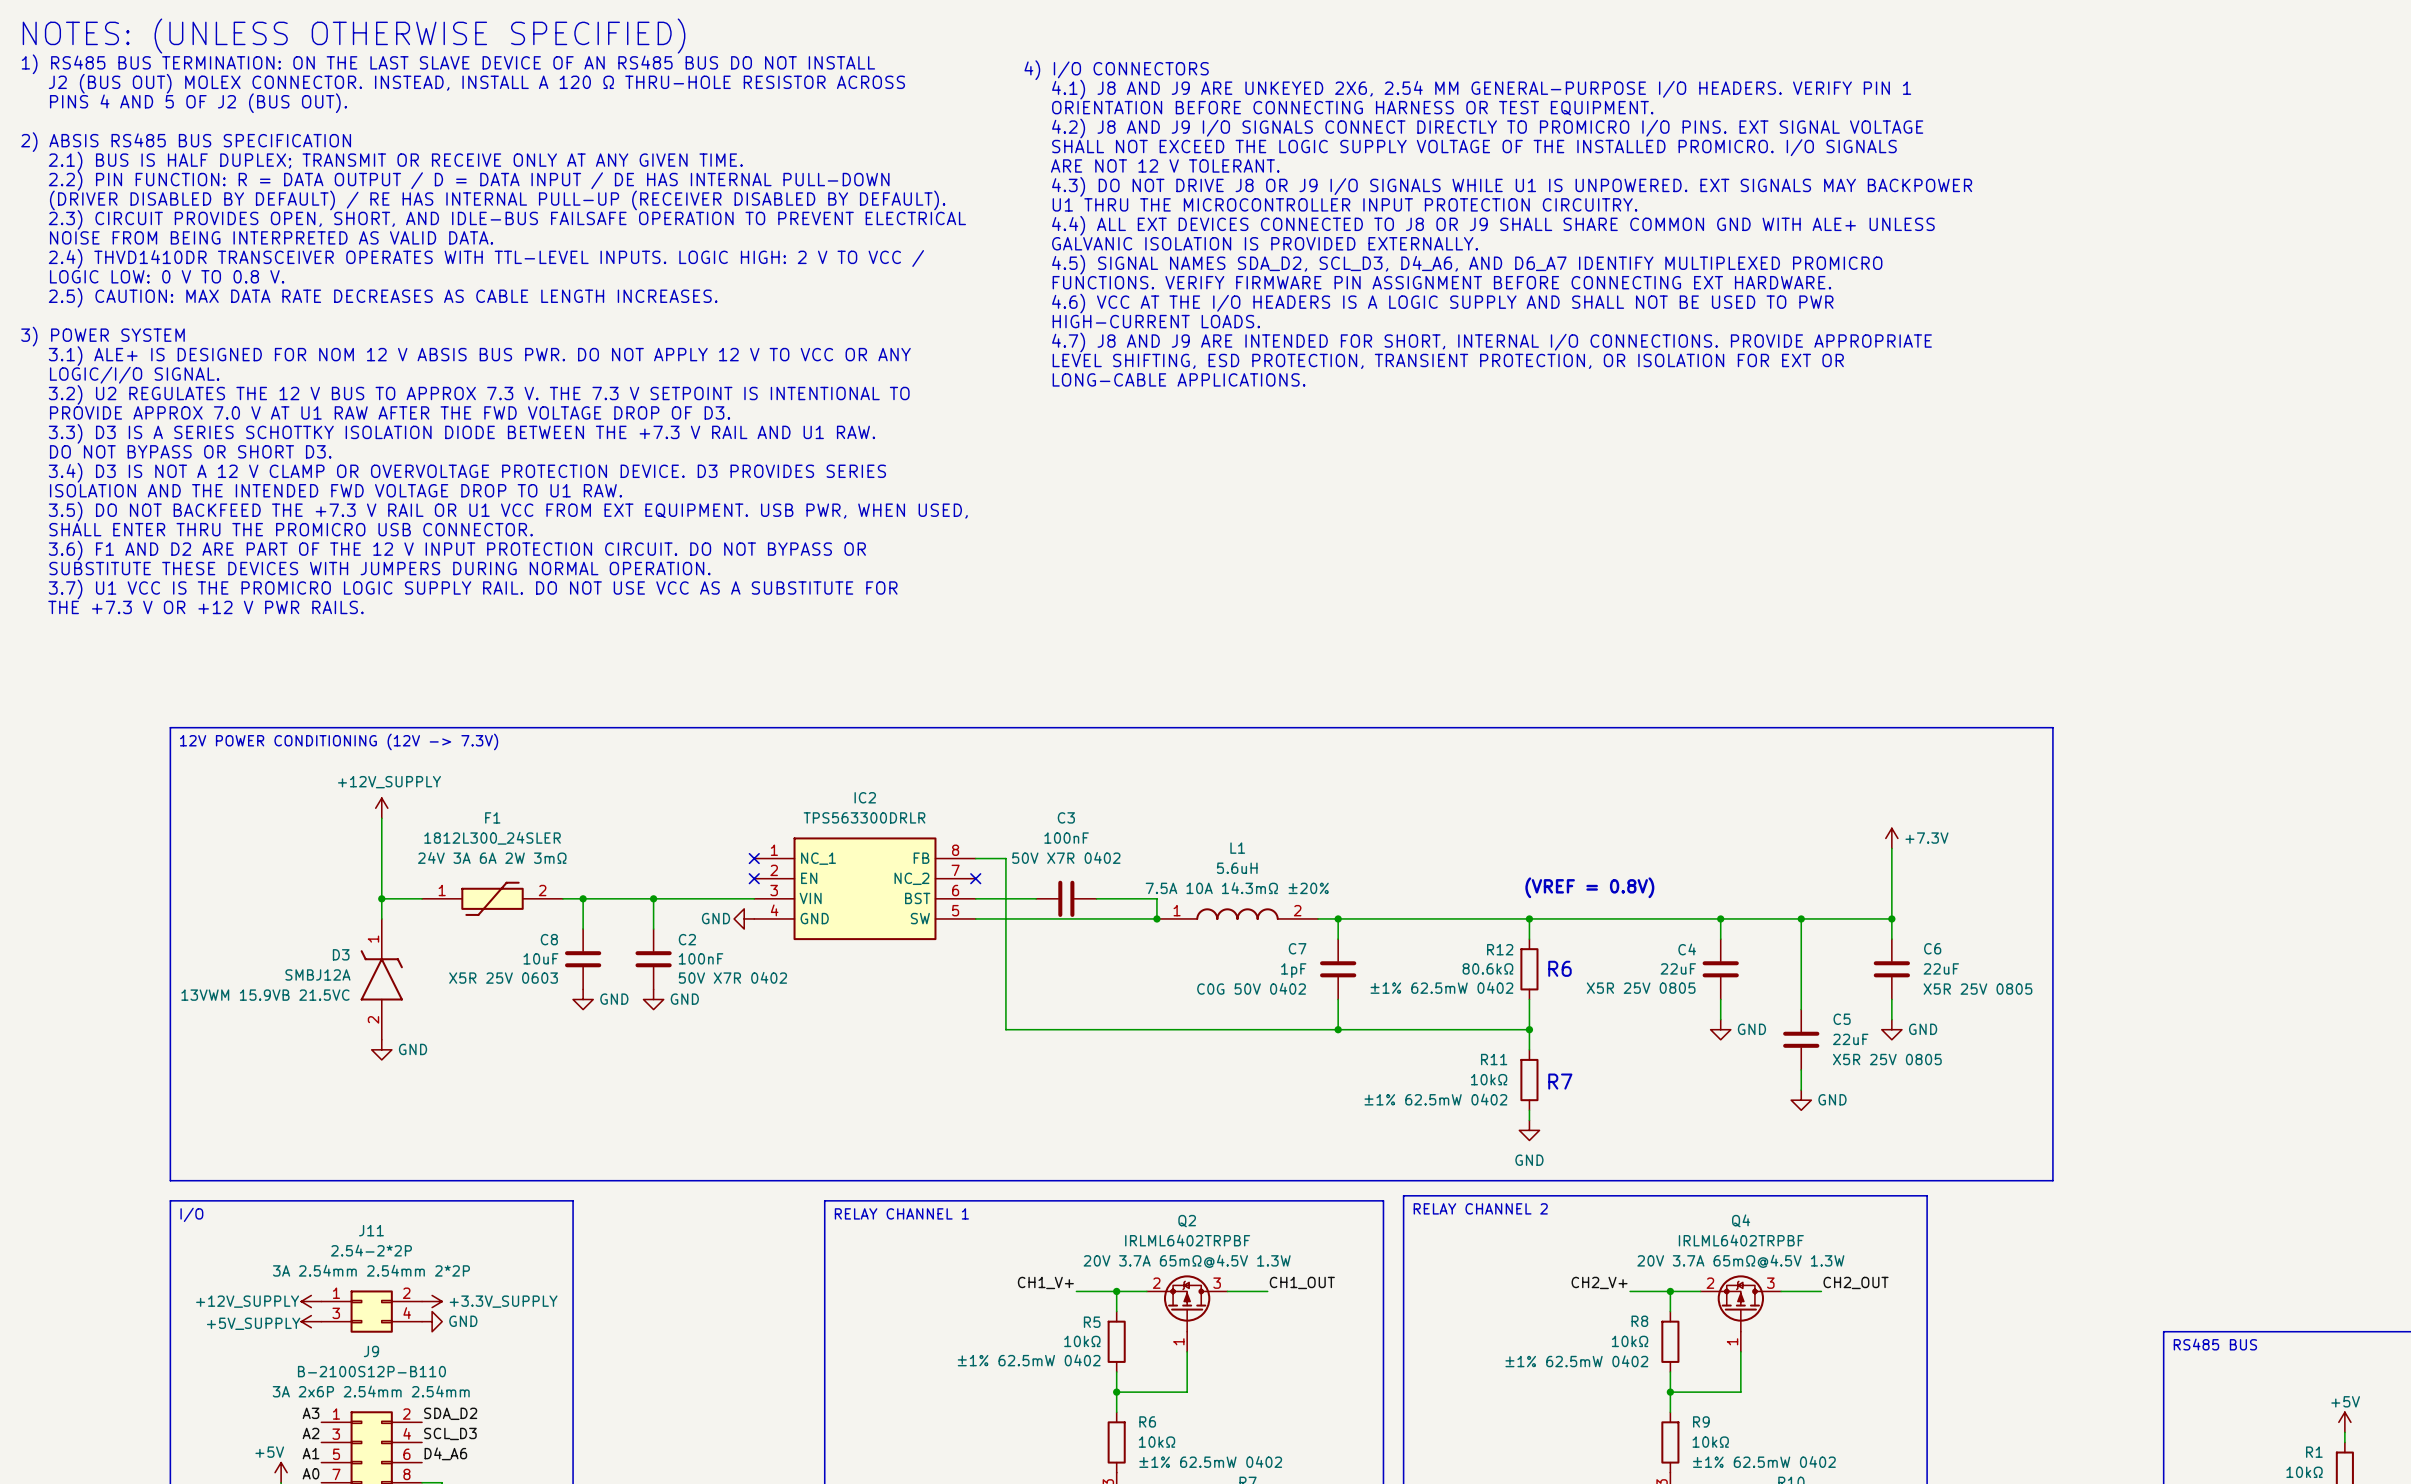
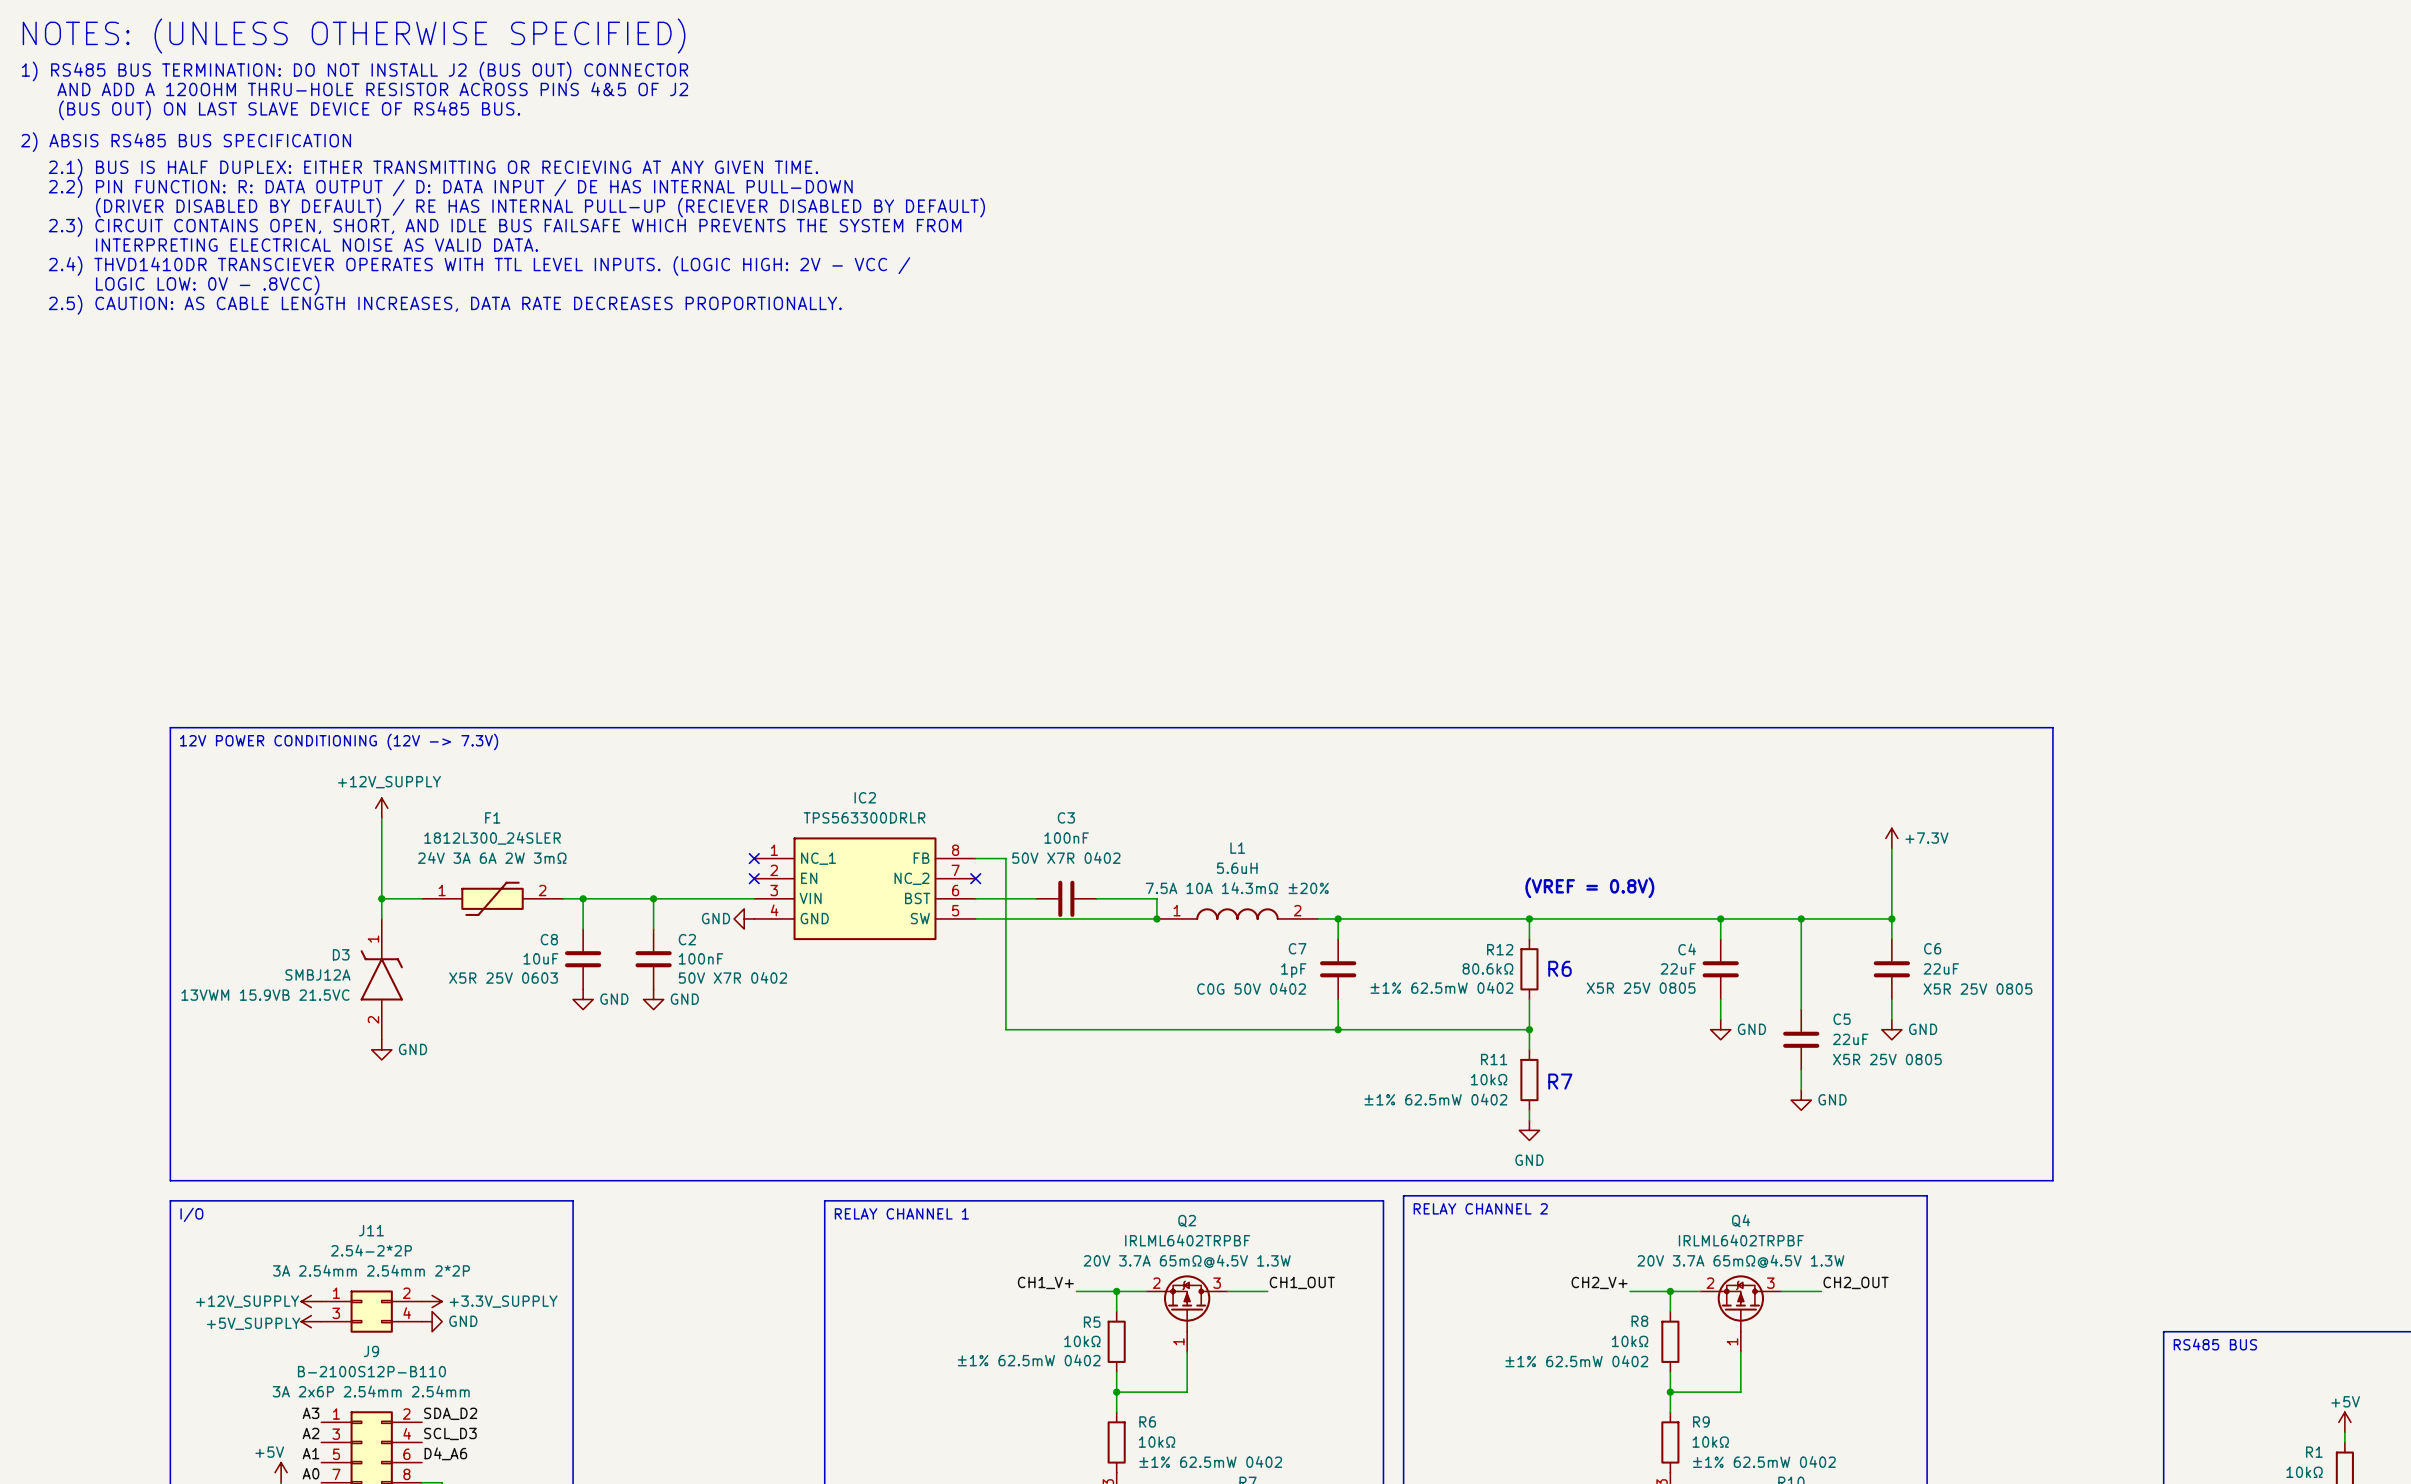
text: 1) RS485 BUS TERMINATION: ON THE LAST SLAVE DEVICE OF AN RS485 BUS DO NOT INSTALL (448, 64) -> none
text: 4) I/O CONNECTORS (1116, 70) -> none
text: none -> 1) RS485 BUS TERMINATION: DO NOT INSTALL J2 (BUS OUT) CONNECTOR (354, 71)
text: J2 (BUS OUT) MOLEX CONNECTOR. INSTEAD, INSTALL A 120 Ω THRU-HOLE RESISTOR ACROSS (476, 83) -> none
text: none -> AND ADD A 120OHM THRU-HOLE RESISTOR ACROSS PINS 4&5 OF J2 (372, 89)
text: 4.1) J8 AND J9 ARE UNKEYED 2X6, 2.54 MM GENERAL-PURPOSE I/O HEADERS. VERIFY PIN 1 (1481, 89) -> none
text: PINS 4 AND 5 OF J2 (BUS OUT). (198, 103) -> none
text: ORIENTATION BEFORE CONNECTING HARNESS OR TEST EQUIPMENT. (1352, 108) -> none
text: none -> (BUS OUT) ON LAST SLAVE DEVICE OF RS485 BUS. (289, 110)
text: 4.2) J8 AND J9 I/O SIGNALS CONNECT DIRECTLY TO PROMICRO I/O PINS. EXT SIGNAL VOLTAGE (1487, 128) -> none
text: SHALL NOT EXCEED THE LOGIC SUPPLY VOLTAGE OF THE INSTALLED PROMICRO. I/O SIGNALS (1474, 147) -> none
text: 2.1) BUS IS HALF DUPLEX; TRANSMIT OR RECEIVE ONLY AT ANY GIVEN TIME. (395, 161) -> 2.1) BUS IS HALF DUPLEX: EITHER TRANSMITTING OR RECIEVING AT ANY GIVEN TIME. (433, 168)
text: ARE NOT 12 V TOLERANT. (1165, 165) -> none
text: 2.2) PIN FUNCTION: R = DATA OUTPUT / D = DATA INPUT / DE HAS INTERNAL PULL-DOWN (469, 180) -> 2.2) PIN FUNCTION: R: DATA OUTPUT / D: DATA INPUT / DE HAS INTERNAL PULL-DOWN (450, 188)
text: 4.3) DO NOT DRIVE J8 OR J9 I/O SIGNALS WHILE U1 IS UNPOWERED. EXT SIGNALS MAY BACKPOWER (1512, 186) -> none
text: (DRIVER DISABLED BY DEFAULT) / RE HAS INTERNAL PULL-UP (RECEIVER DISABLED BY DEFAULT). (497, 200) -> (DRIVER DISABLED BY DEFAULT) / RE HAS INTERNAL PULL-UP (RECIEVER DISABLED BY DEFAULT) (540, 207)
text: U1 THRU THE MICROCONTROLLER INPUT PROTECTION CIRCUITRY. (1344, 204) -> none
text: 2.3) CIRCUIT PROVIDES OPEN, SHORT, AND IDLE-BUS FAILSAFE OPERATION TO PREVENT ELECTRICAL (507, 219) -> 2.3) CIRCUIT CONTAINS OPEN, SHORT, AND IDLE BUS FAILSAFE WHICH PREVENTS THE SYSTEM FROM (505, 227)
text: 4.4) ALL EXT DEVICES CONNECTED TO J8 OR J9 SHALL SHARE COMMON GND WITH ALE+ UNLESS (1493, 225) -> none
text: NOISE FROM BEING INTERPRETED AS VALID DATA. (271, 237) -> INTERPRETING ELECTRICAL NOISE AS VALID DATA. (316, 245)
text: GALVANIC ISOLATION IS PROVIDED EXTERNALLY. (1265, 243) -> none
text: 2.4) THVD1410DR TRANSCEIVER OPERATES WITH TTL-LEVEL INPUTS. LOGIC HIGH: 2 V TO VCC / (486, 258) -> 2.4) THVD1410DR TRANSCIEVER OPERATES WITH TTL LEVEL INPUTS. (LOGIC HIGH: 2V - VCC / (479, 265)
text: 4.5) SIGNAL NAMES SDA_D2, SCL_D3, D4_A6, AND D6_A7 IDENTIFY MULTIPLEXED PROMICRO (1467, 264) -> none
text: LOGIC LOW: 0 V TO 0.8 V. (167, 276) -> LOGIC LOW: 0V - .8VCC) (207, 285)
text: FUNCTIONS. VERIFY FIRMWARE PIN ASSIGNMENT BEFORE CONNECTING EXT HARDWARE. (1441, 282) -> none
text: 2.5) CAUTION: MAX DATA RATE DECREASES AS CABLE LENGTH INCREASES. (383, 297) -> none
text: 4.6) VCC AT THE I/O HEADERS IS A LOGIC SUPPLY AND SHALL NOT BE USED TO PWR (1442, 303) -> none
text: none -> 2.5) CAUTION: AS CABLE LENGTH INCREASES, DATA RATE DECREASES PROPORTIONALLY. (445, 304)
text: HIGH-CURRENT LOADS. (1156, 321) -> none
text: 3) POWER SYSTEM (102, 336) -> none
text: 4.7) J8 AND J9 ARE INTENDED FOR SHORT, INTERNAL I/O CONNECTIONS. PROVIDE APPROPRIATE (1491, 342) -> none
text: 3.1) ALE+ IS DESIGNED FOR NOM 12 V ABSIS BUS PWR. DO NOT APPLY 12 V TO VCC OR ANY (479, 356) -> none
text: LEVEL SHIFTING, ESD PROTECTION, TRANSIENT PROTECTION, OR ISOLATION FOR EXT OR (1448, 361) -> none
text: LOGIC/I/O SIGNAL. (134, 375) -> none
text: LONG-CABLE APPLICATIONS. (1179, 379) -> none
text: 3.2) U2 REGULATES THE 12 V BUS TO APPROX 7.3 V. THE 7.3 V SETPOINT IS INTENTIONAL TO (479, 394) -> none
text: PROVIDE APPROX 7.0 V AT U1 RAW AFTER THE FWD VOLTAGE DROP OF D3. (390, 412) -> none
text: 3.3) D3 IS A SERIES SCHOTTKY ISOLATION DIODE BETWEEN THE +7.3 V RAIL AND U1 RAW. (461, 433) -> none
text: DO NOT BYPASS OR SHORT D3. (190, 451) -> none
text: 3.4) D3 IS NOT A 12 V CLAMP OR OVERVOLTAGE PROTECTION DEVICE. D3 PROVIDES SERIES (467, 472) -> none
text: ISOLATION AND THE INTENDED FWD VOLTAGE DROP TO U1 RAW. (335, 490) -> none
text: 3.5) DO NOT BACKFEED THE +7.3 V RAIL OR U1 VCC FROM EXT EQUIPMENT. USB PWR, WHEN USED, (508, 511) -> none
text: SHALL ENTER THRU THE PROMICRO USB CONNECTOR. (291, 529) -> none
text: 3.6) F1 AND D2 ARE PART OF THE 12 V INPUT PROTECTION CIRCUIT. DO NOT BYPASS OR (457, 550) -> none
text: SUBSTITUTE THESE DEVICES WITH JUMPERS DURING NORMAL OPERATION. (379, 568) -> none
text: 3.7) U1 VCC IS THE PROMICRO LOGIC SUPPLY RAIL. DO NOT USE VCC AS A SUBSTITUTE FOR (473, 589) -> none
text: THE +7.3 V OR +12 V PWR RAILS. (205, 607) -> none

